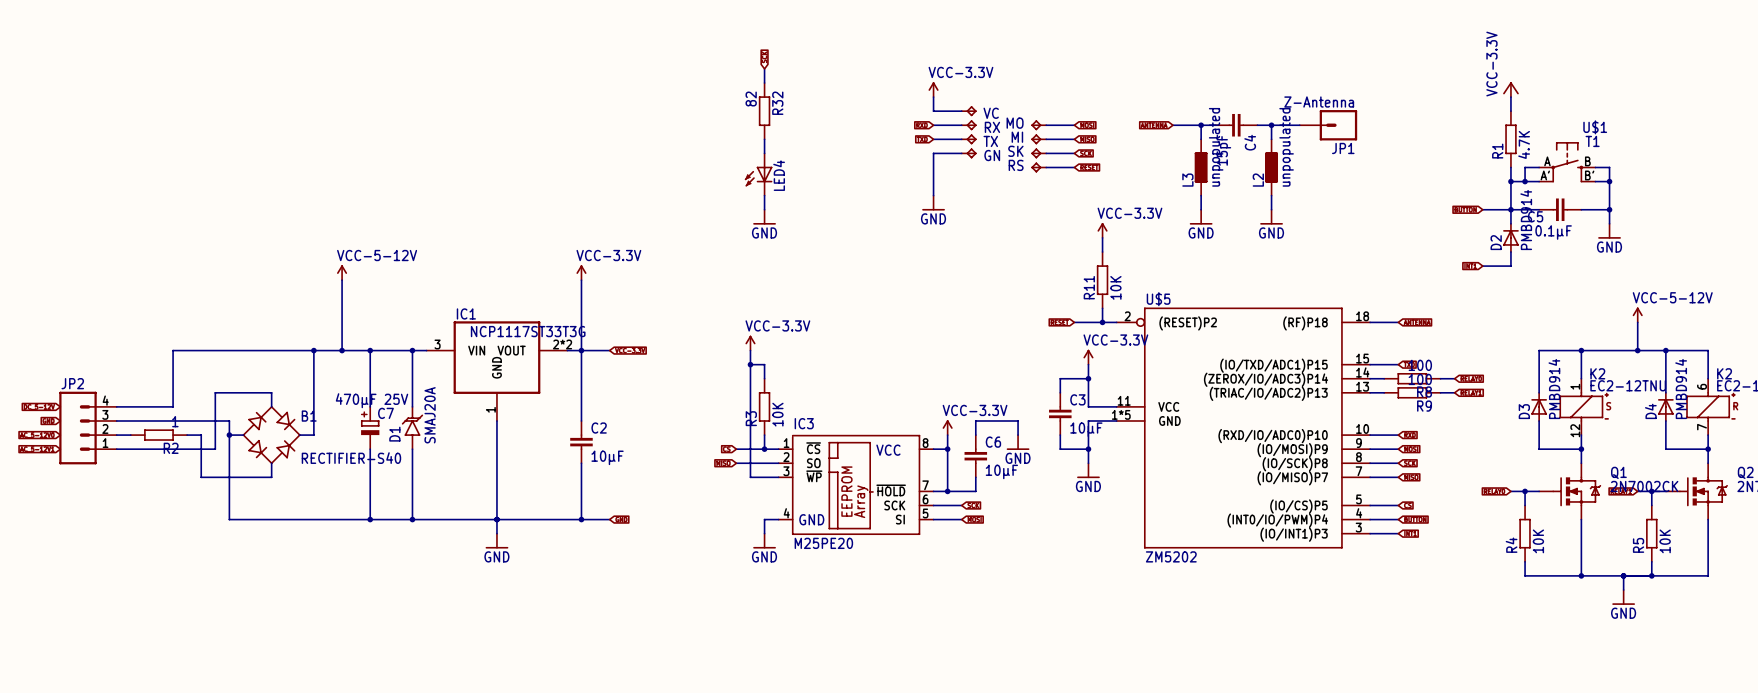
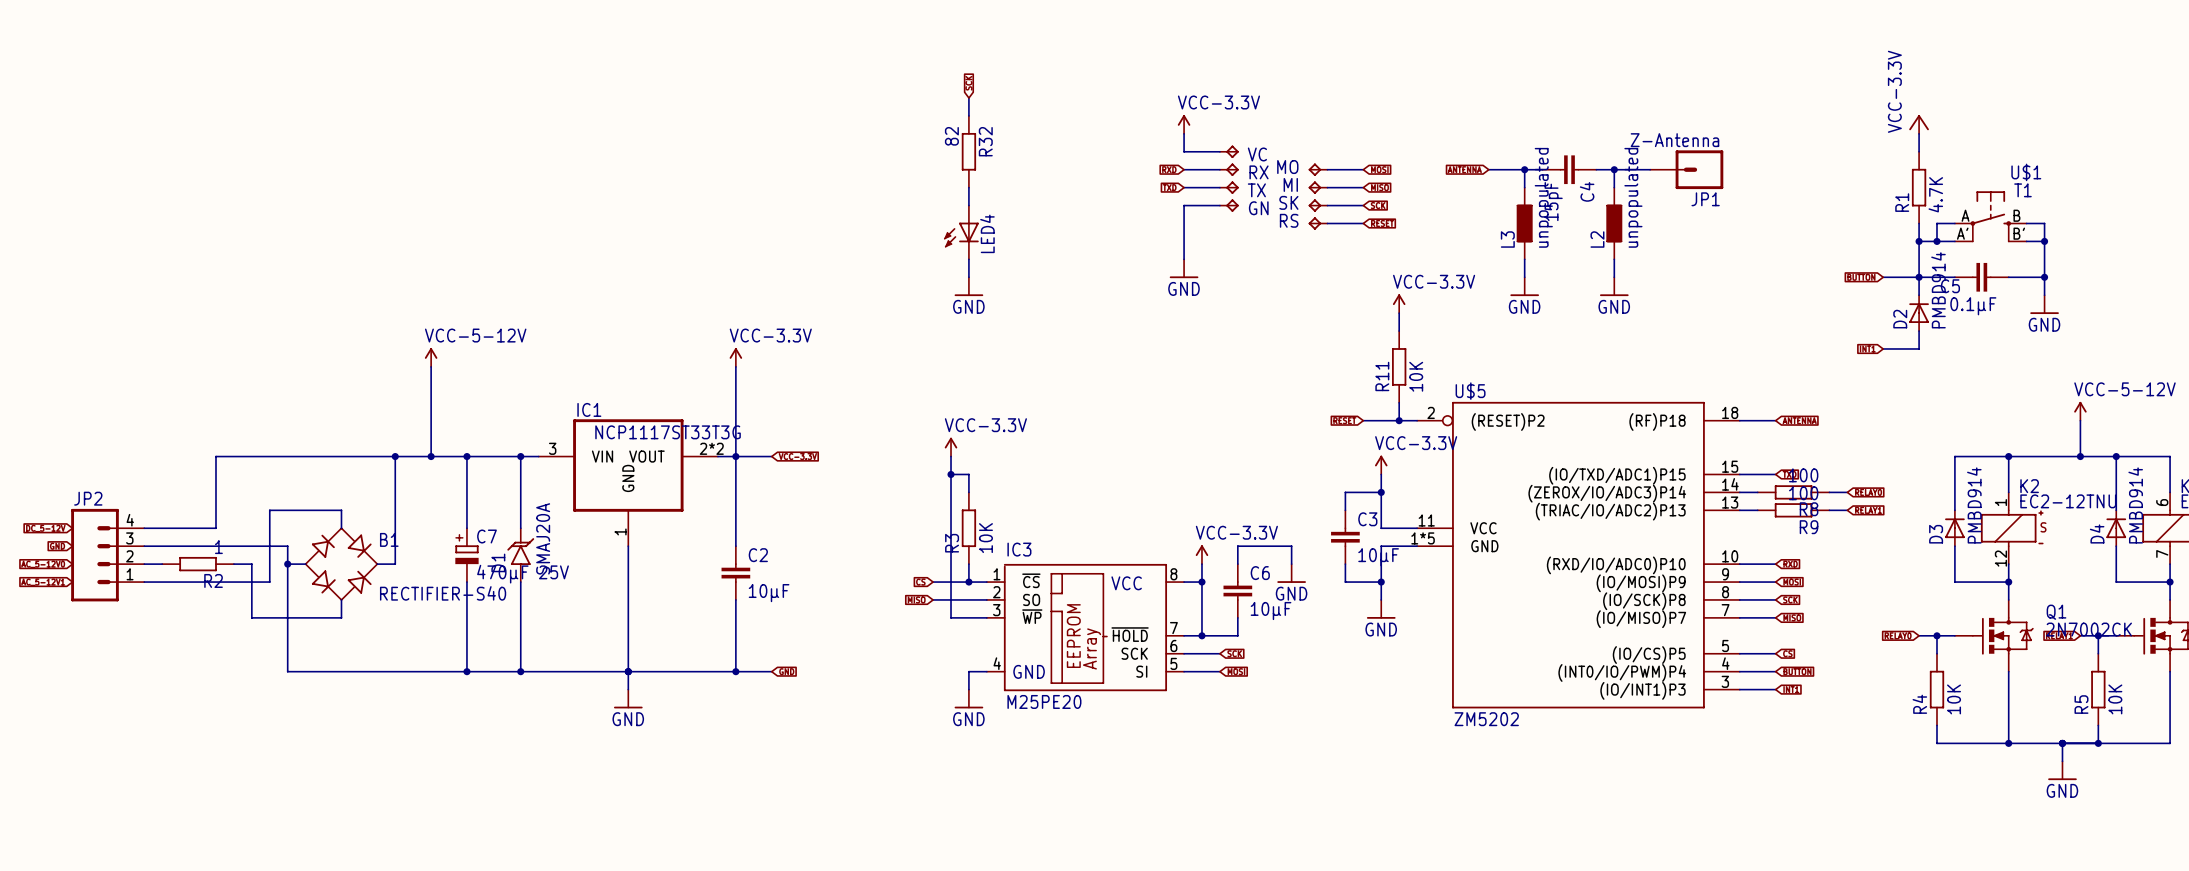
C7 value position: 470µF 25V (372, 400) -> 470µF 25V (523, 574)

